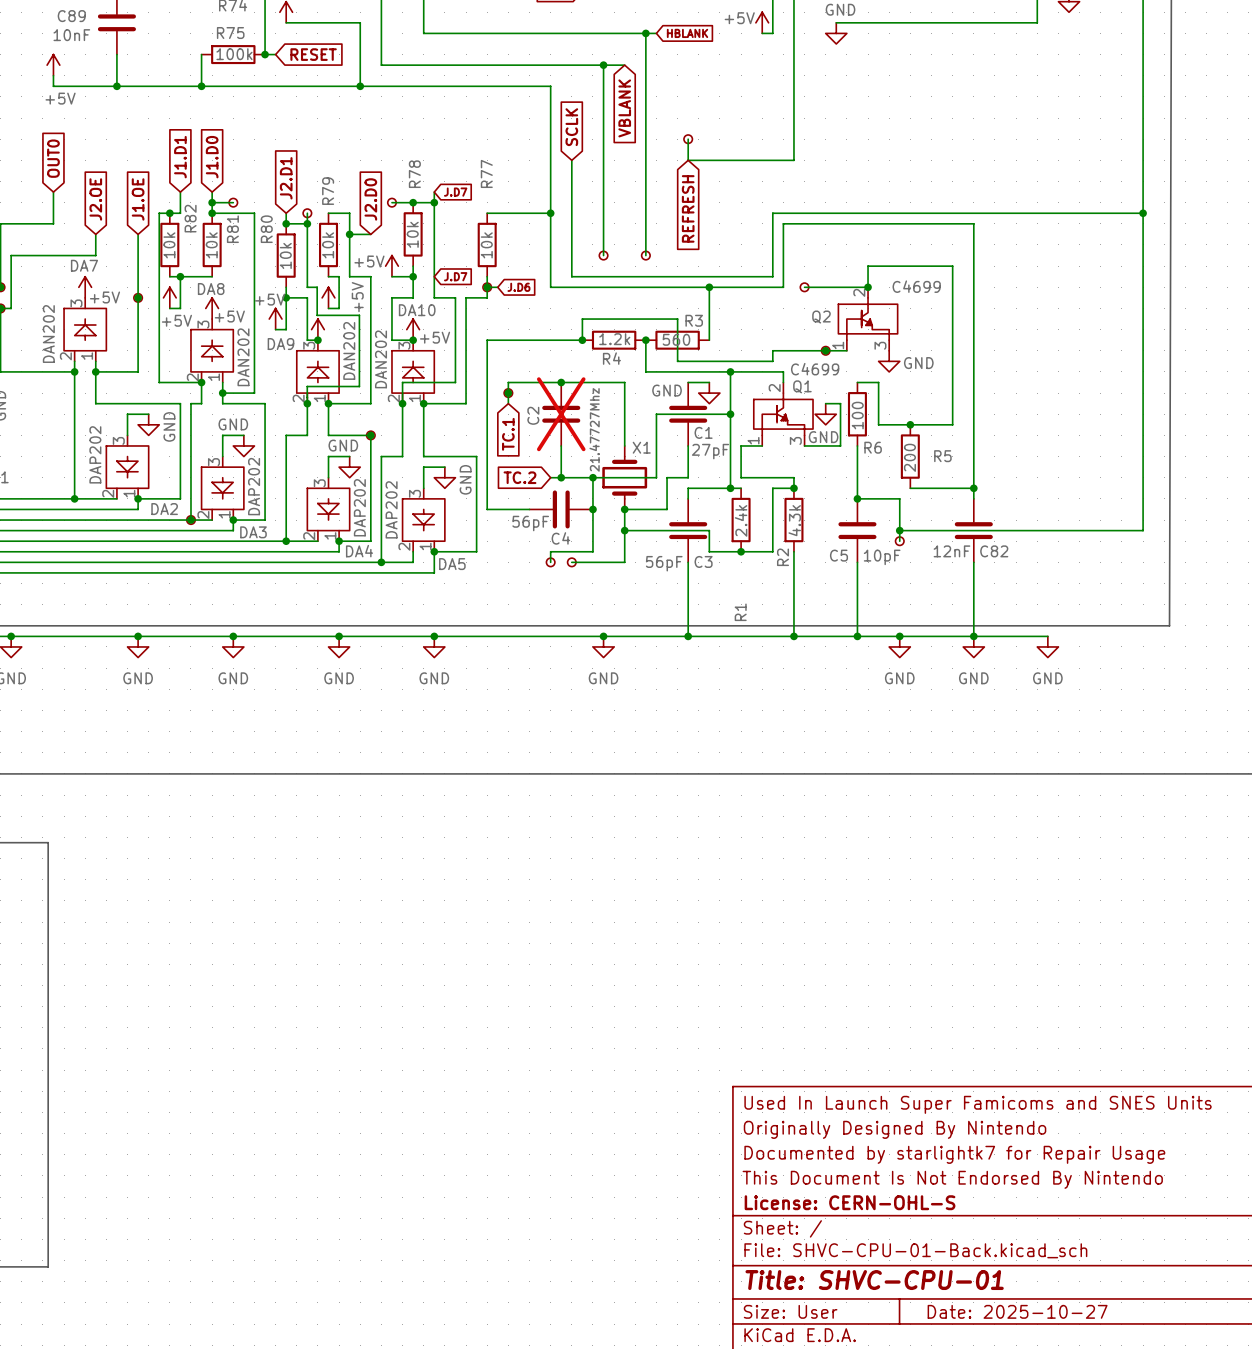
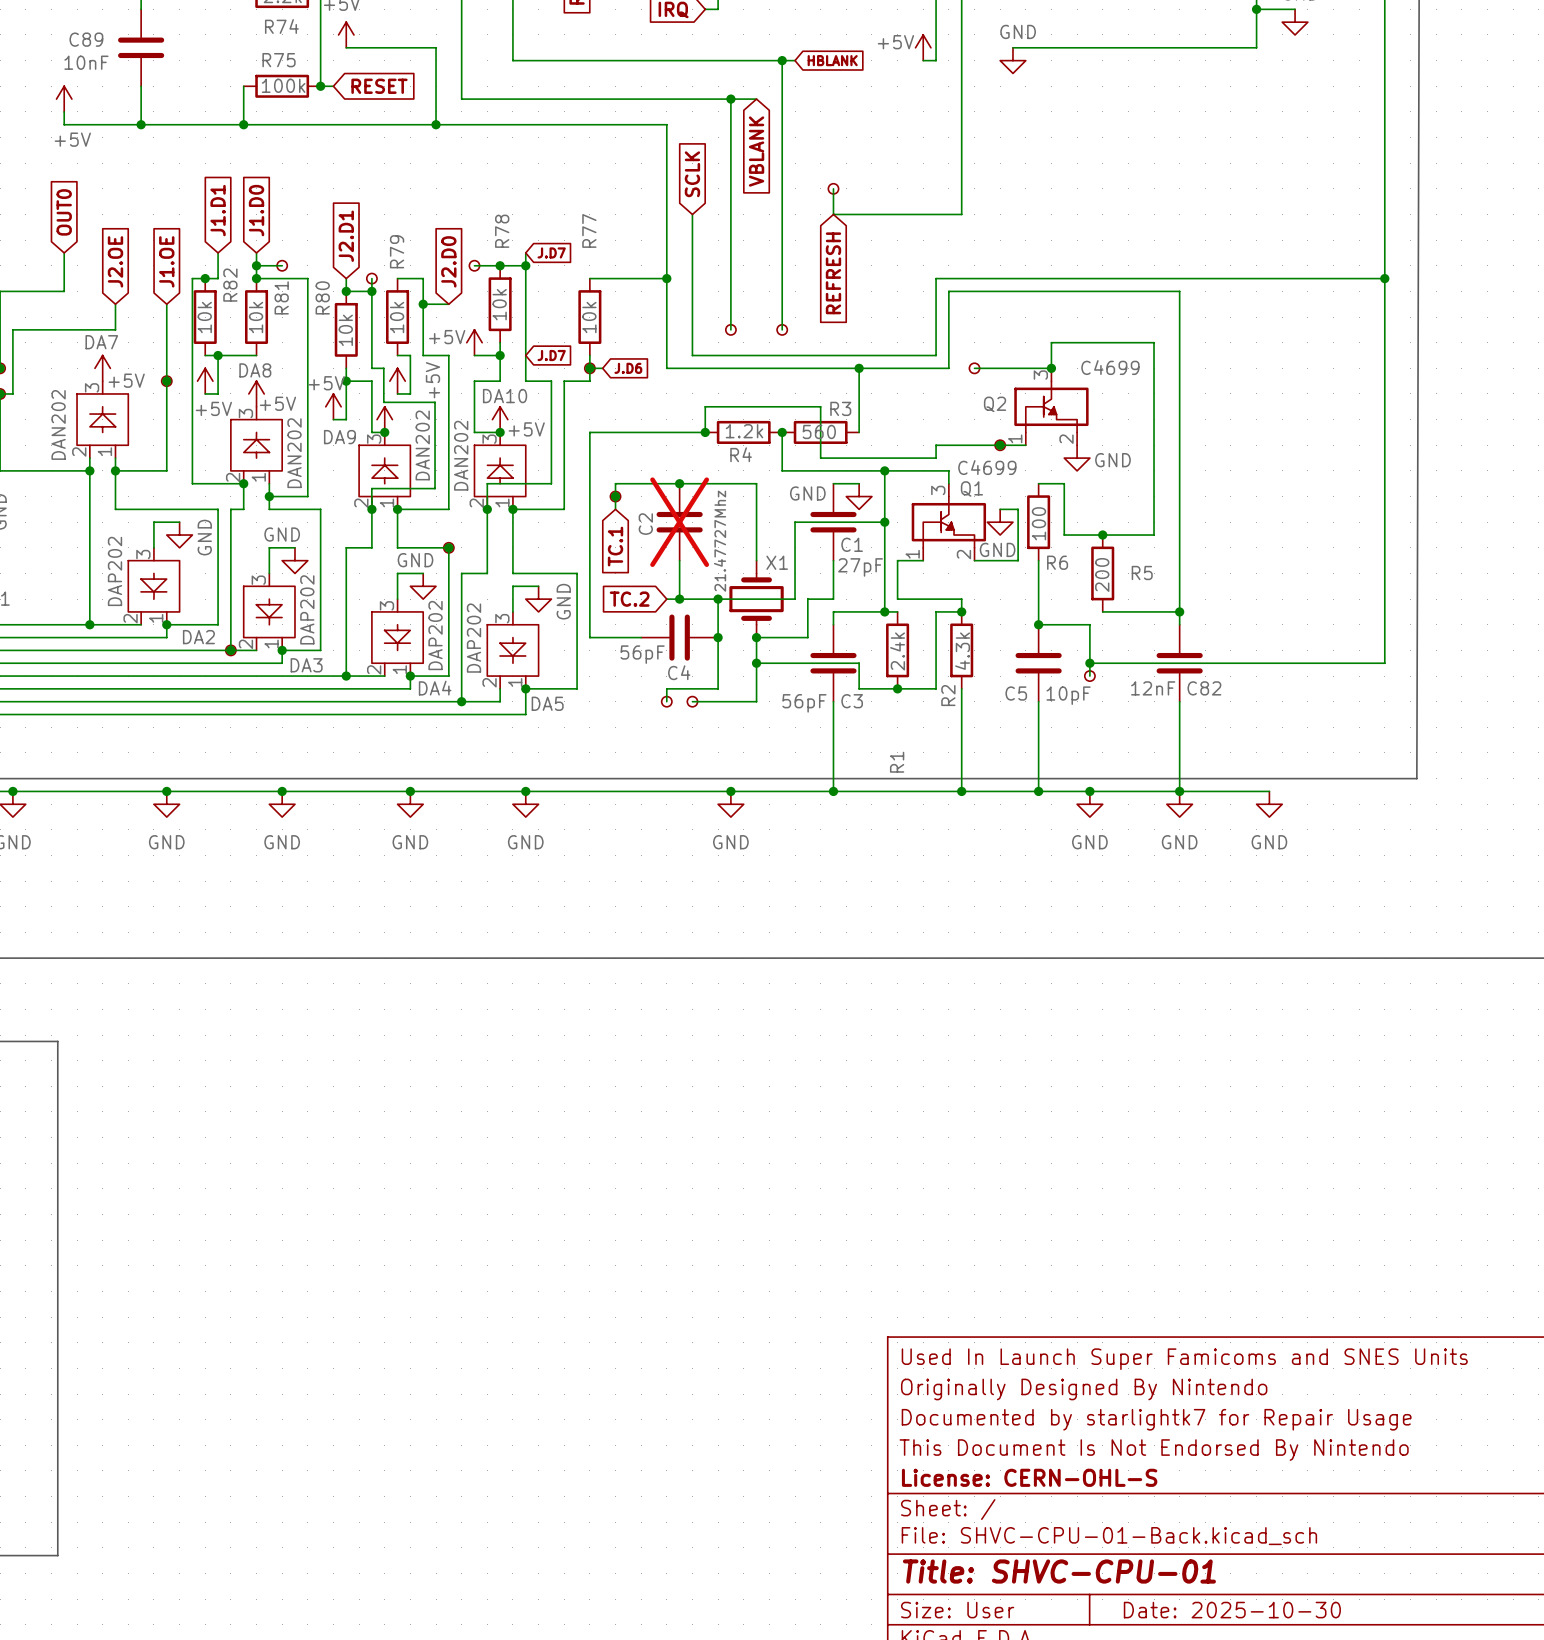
Q2 symbol: [838, 287, 898, 351] -> [1014, 368, 1089, 446]
Q1 symbol: [753, 382, 814, 446] -> [911, 483, 987, 561]
title block: Date: 2025-10-27 (1017, 1311) -> Date: 2025-10-30 (1232, 1610)

